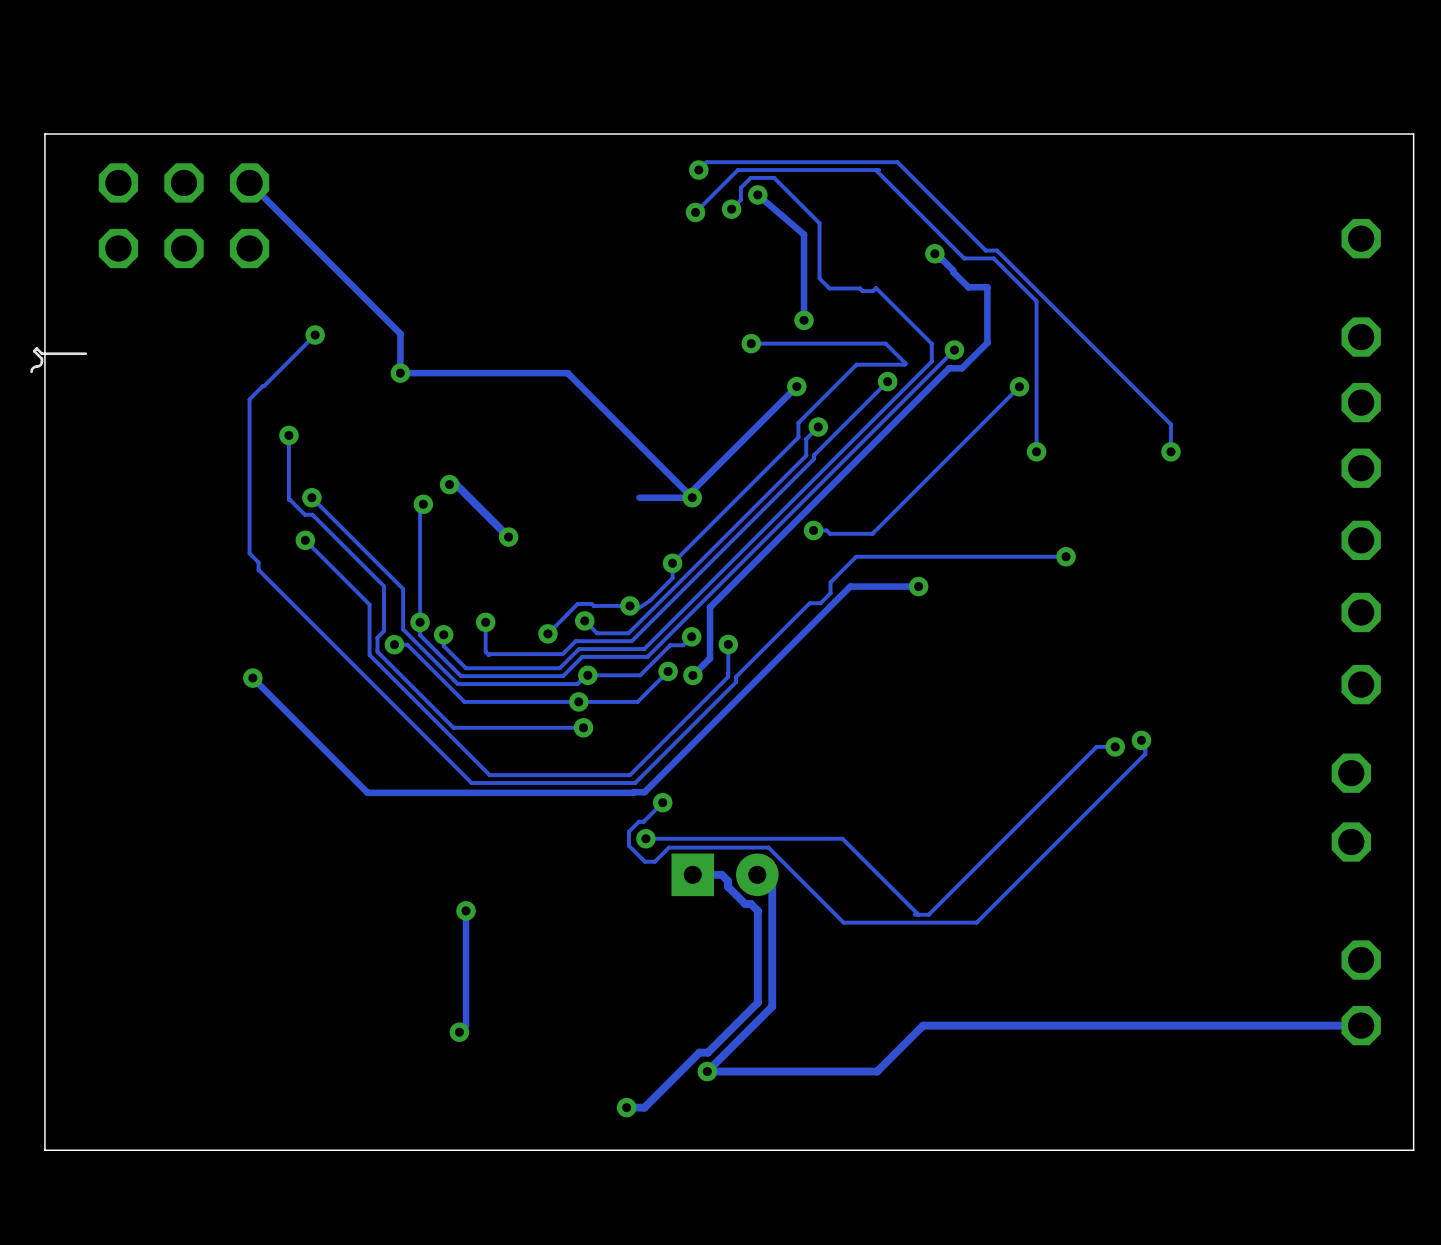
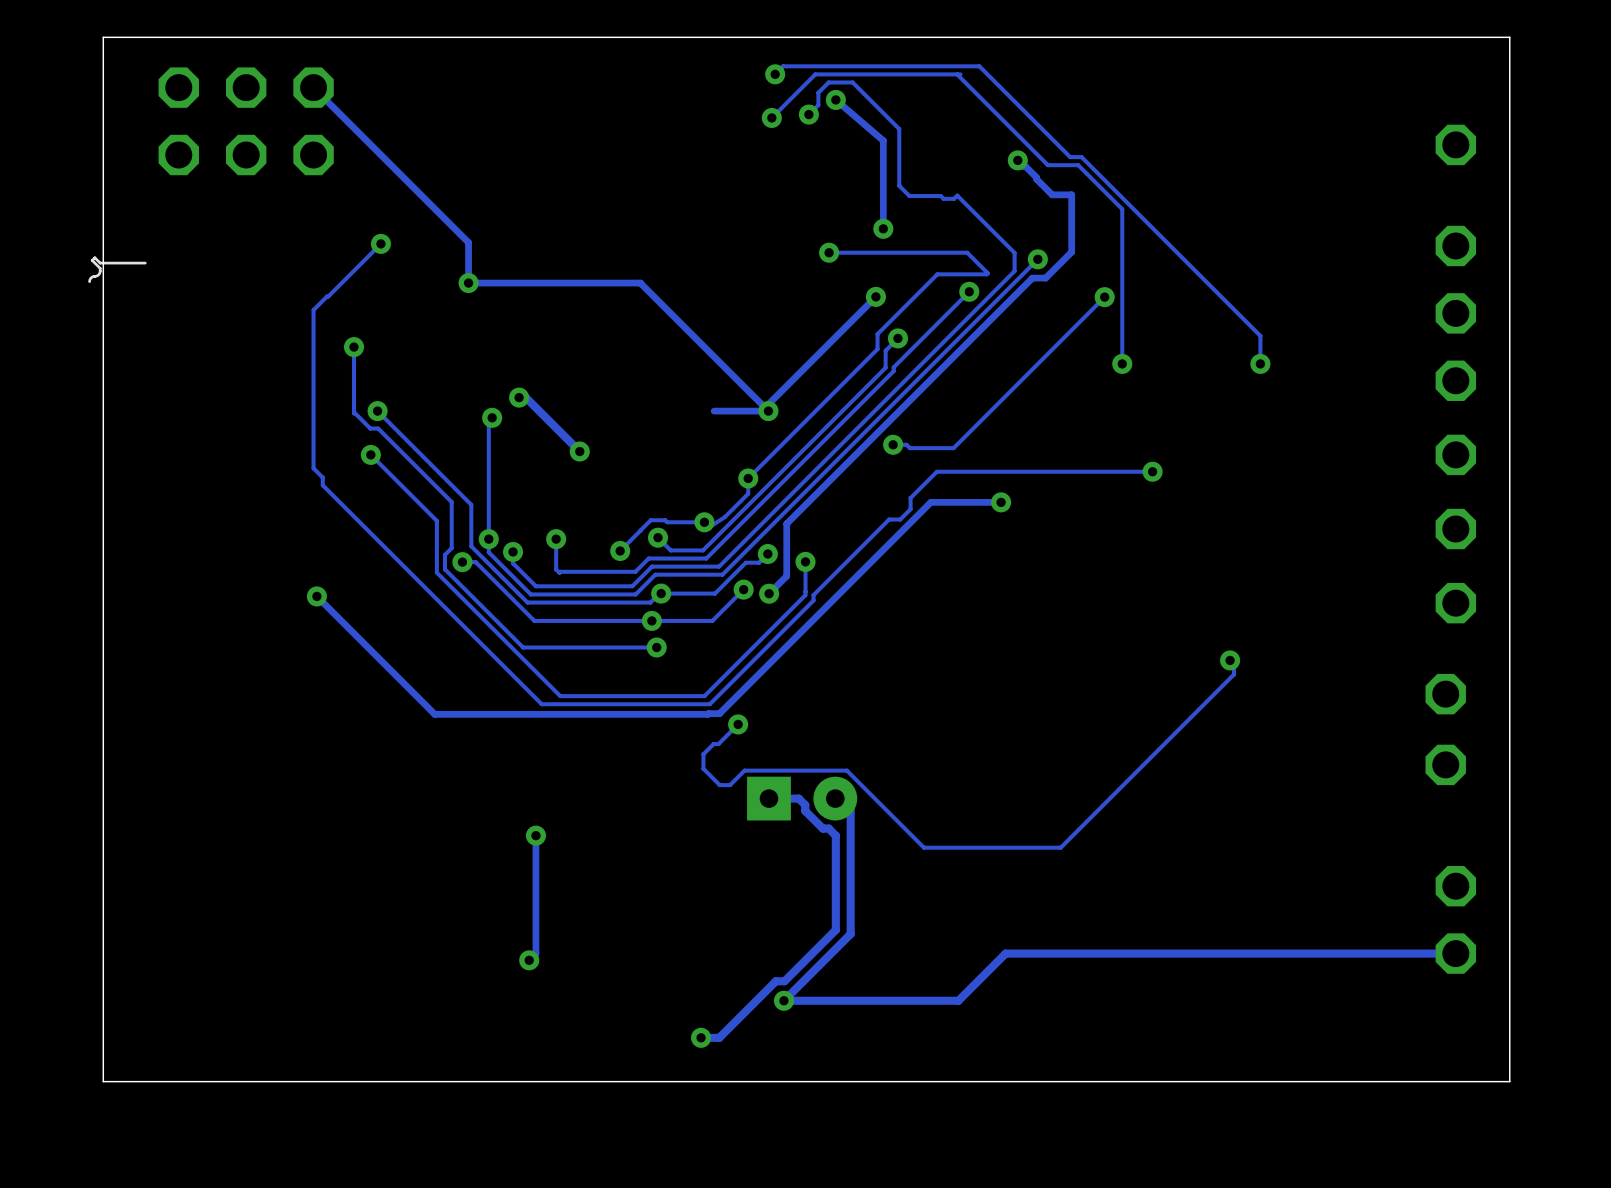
track: (1115, 746) (1096, 746) (928, 914) (914, 914) -> none
via: (1115, 746) -> none
track: (645, 838) (842, 838) (918, 914) -> none
via: (645, 838) -> none

